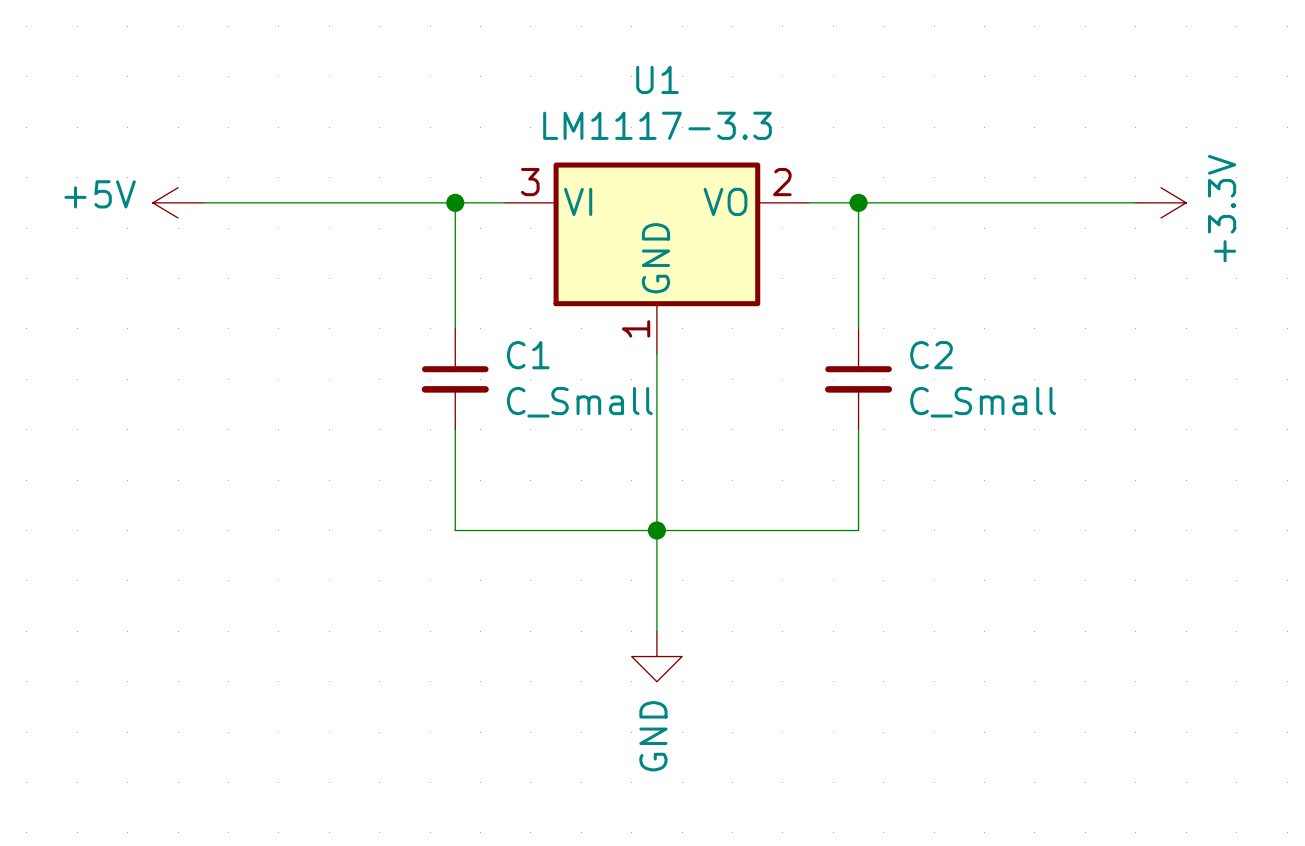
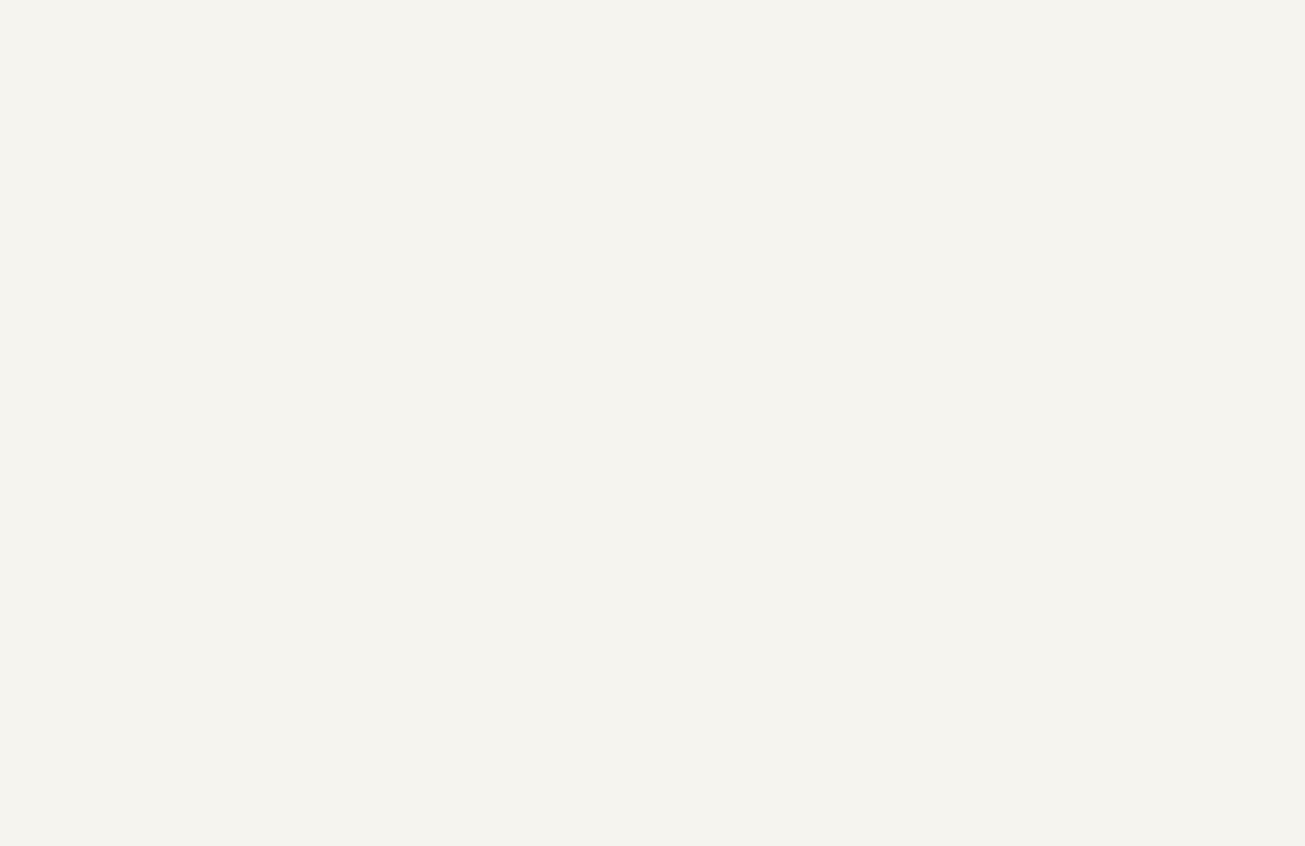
power symbol: +5V (178, 202) -> none
wire: (203, 202) (505, 202) -> none
wire: (455, 202) (455, 328) -> none
junction: (455, 202) -> none
wire: (808, 202) (1135, 202) -> none
wire: (858, 202) (858, 328) -> none
junction: (858, 202) -> none
power symbol: +3.3V (1161, 202) -> none
U1: LM1117-3.3 (656, 258) -> none
wire: (656, 354) (656, 631) -> none
C1: C_Small (455, 379) -> none
C2: C_Small (858, 379) -> none
wire: (455, 429) (455, 530) (858, 530) (858, 429) -> none
junction: (656, 530) -> none
power symbol: GND (656, 656) -> none

